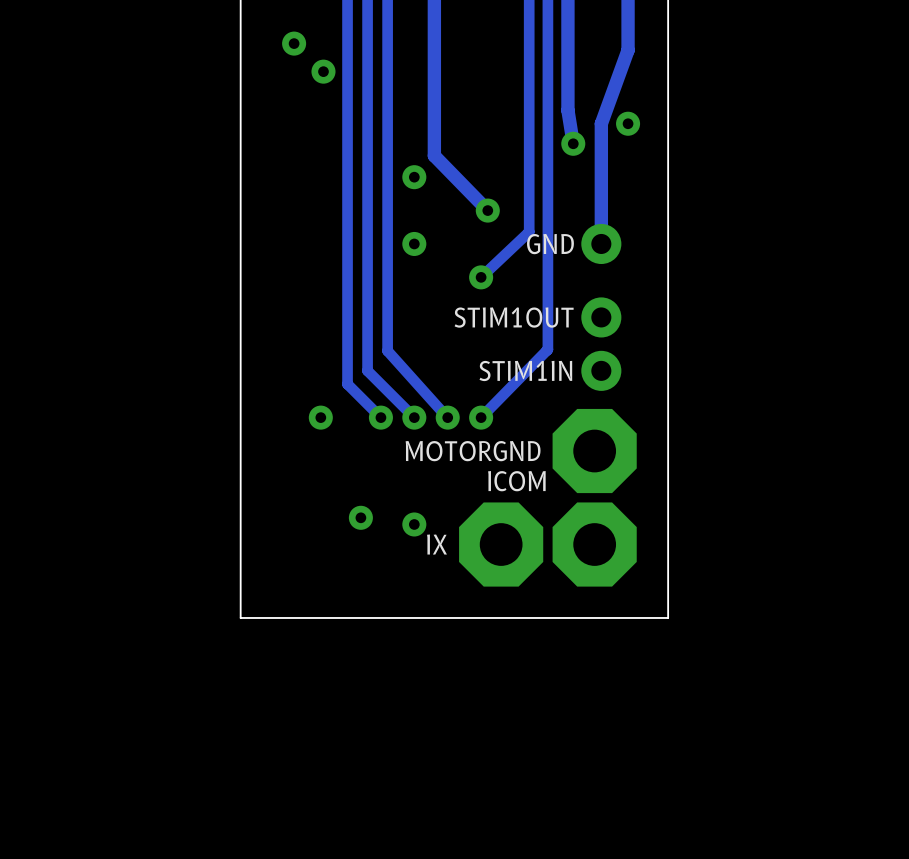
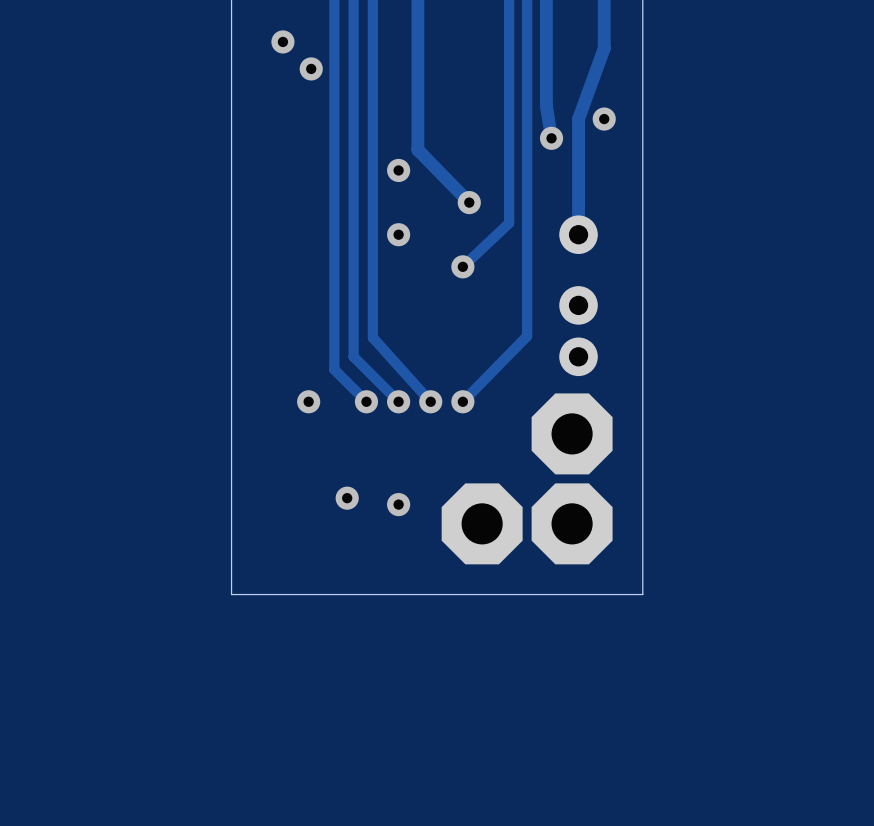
GND name: GND (550, 244) -> none
STIM1OUT name: STIM1OUT (514, 317) -> none
STIM1IN name: STIM1IN (525, 370) -> none
MOTORGND name: MOTORGND (473, 451) -> none
ICOM name: ICOM (516, 481) -> none
IX name: IX (437, 544) -> none

